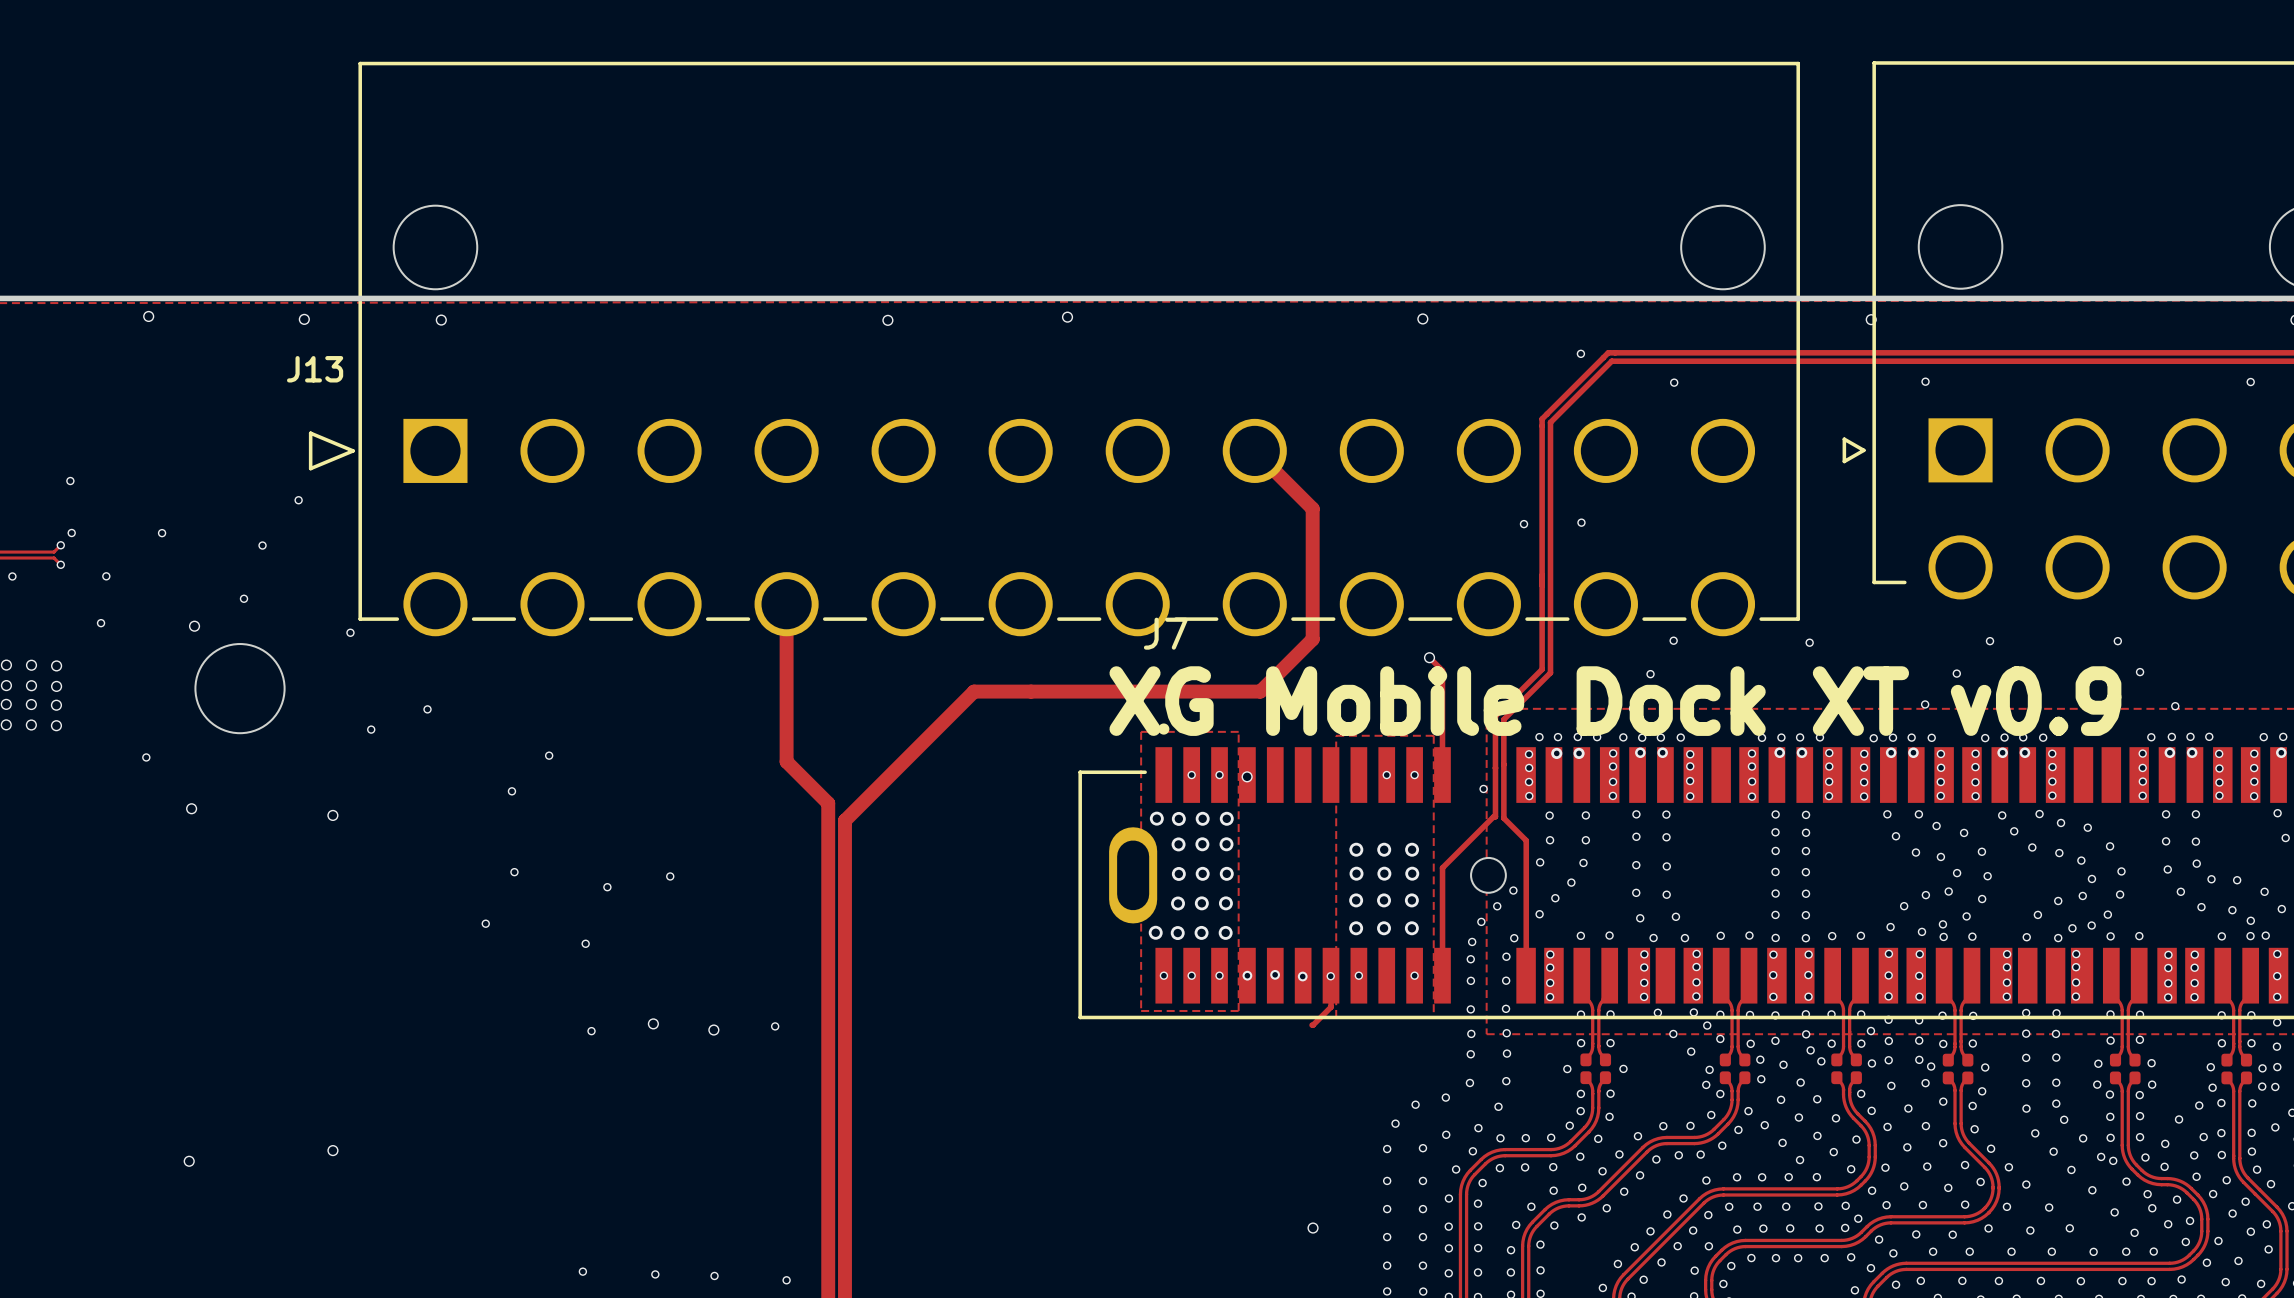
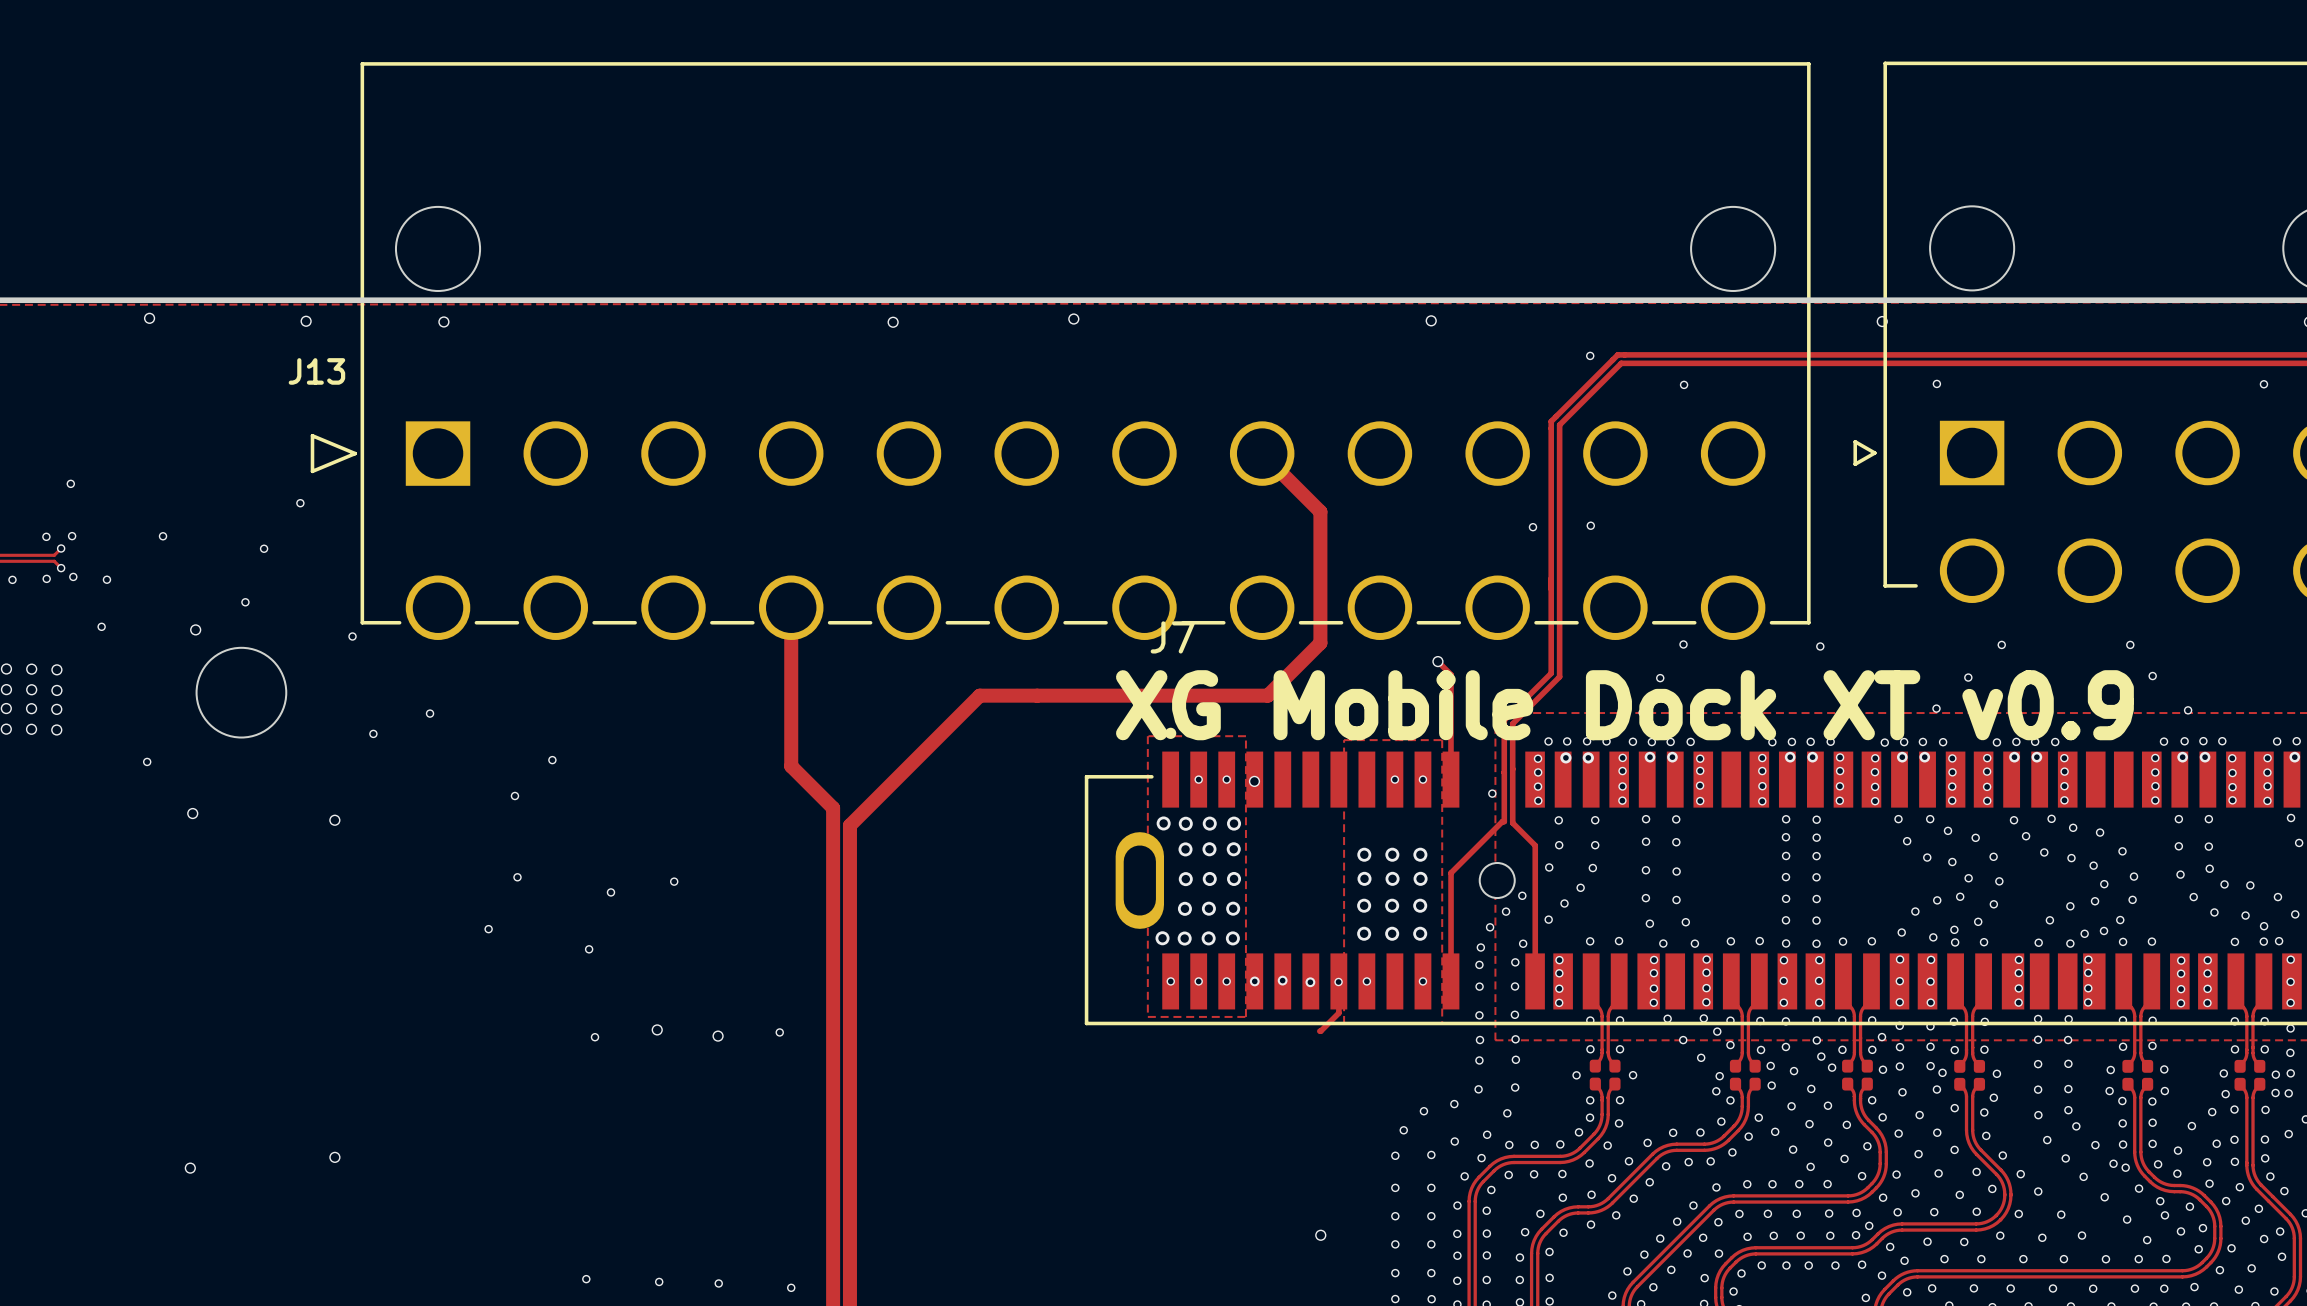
via: none -> (46, 536)
via: none -> (73, 576)
via: none -> (46, 578)

